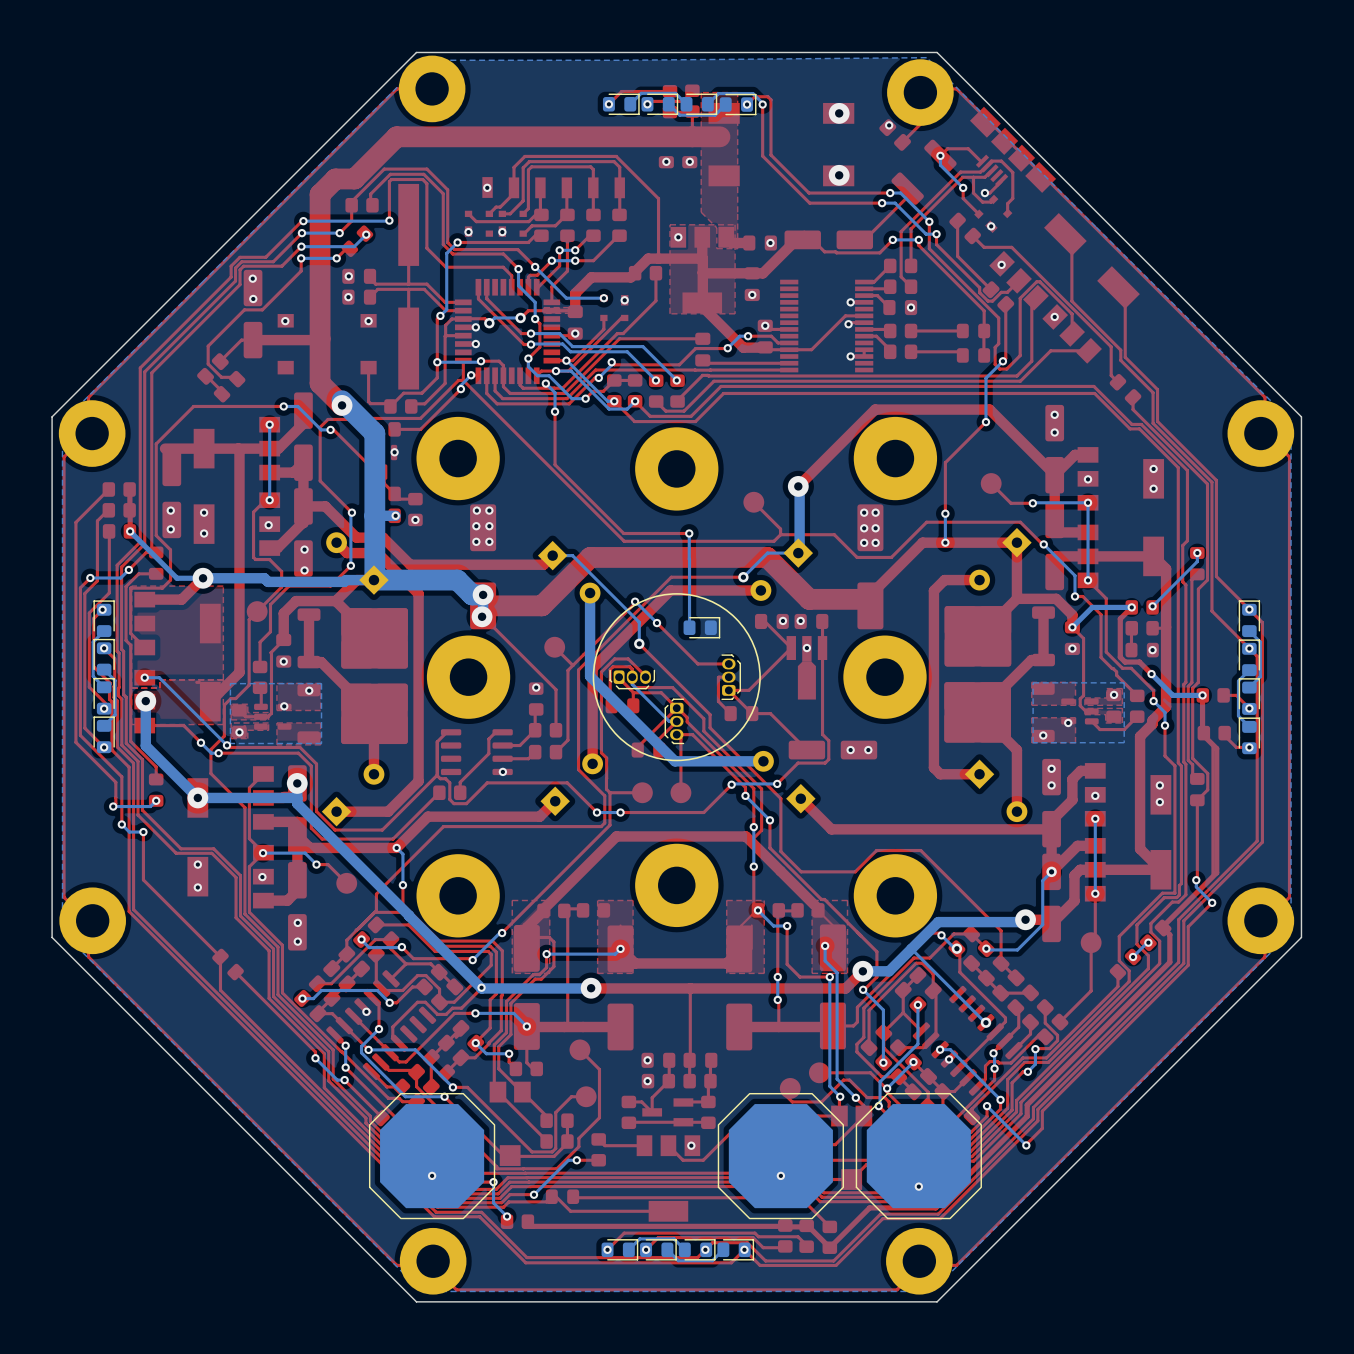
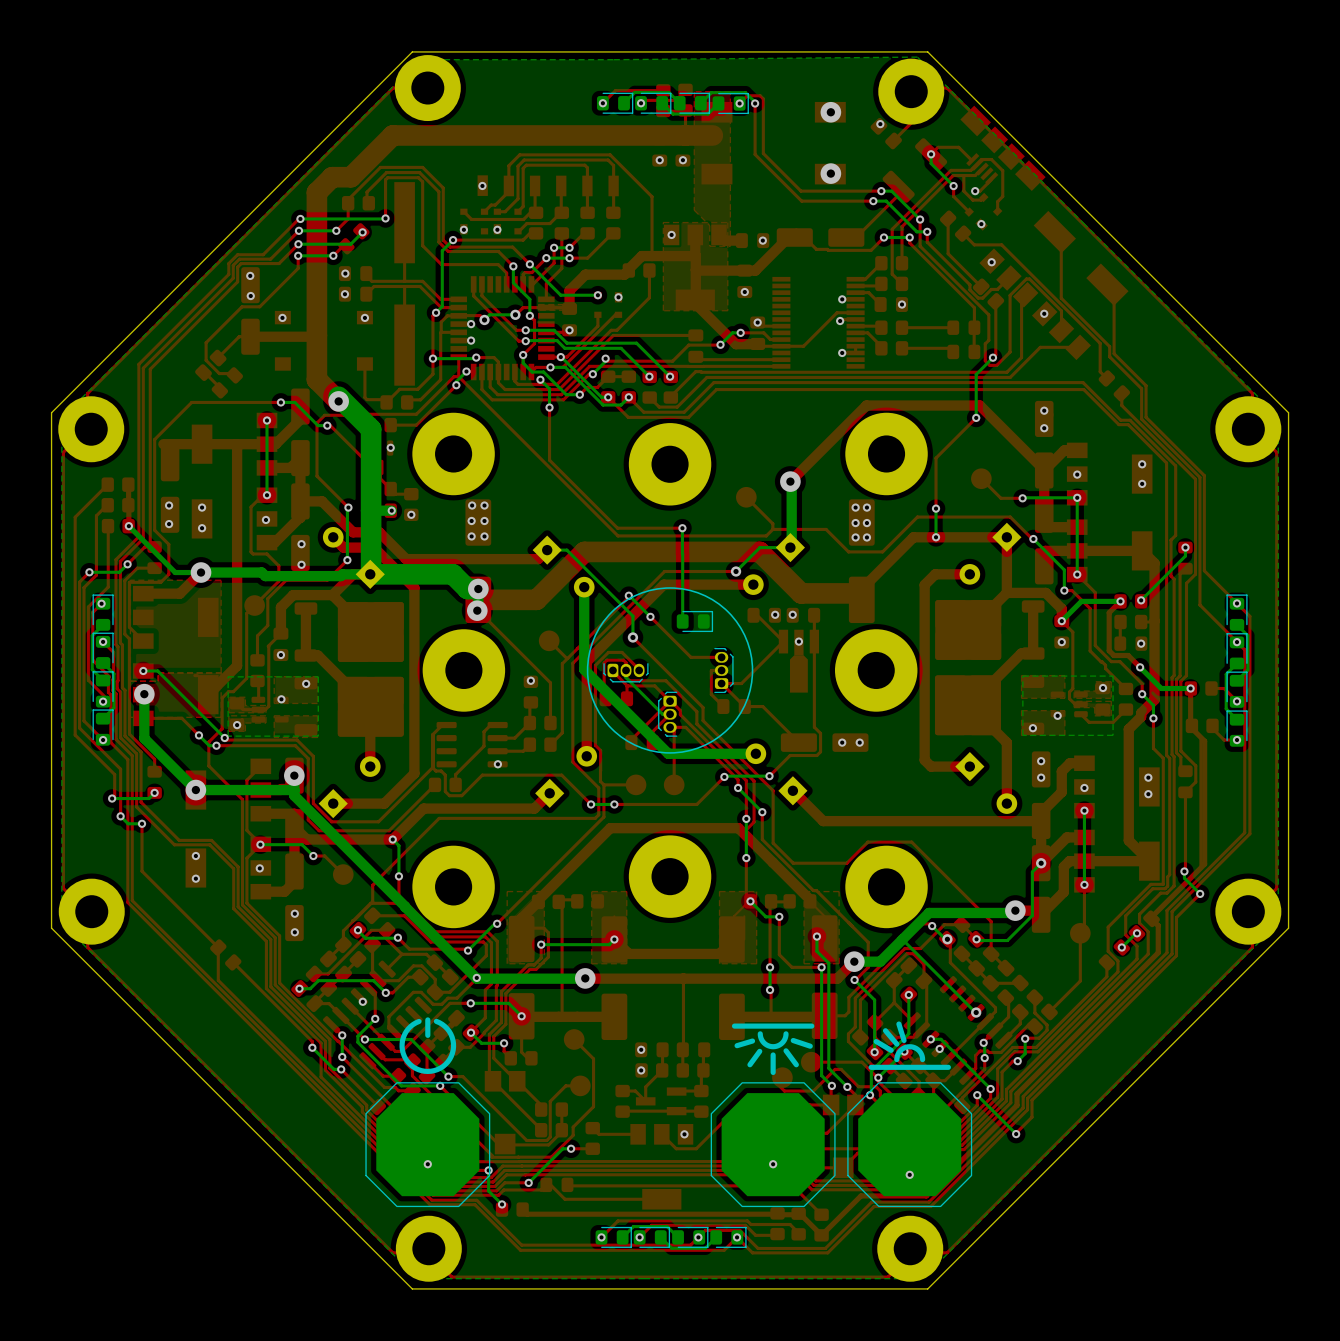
drawing: none -> [399, 1017, 457, 1075]
drawing: none -> [868, 1021, 951, 1070]
drawing: none -> [731, 1023, 815, 1076]

